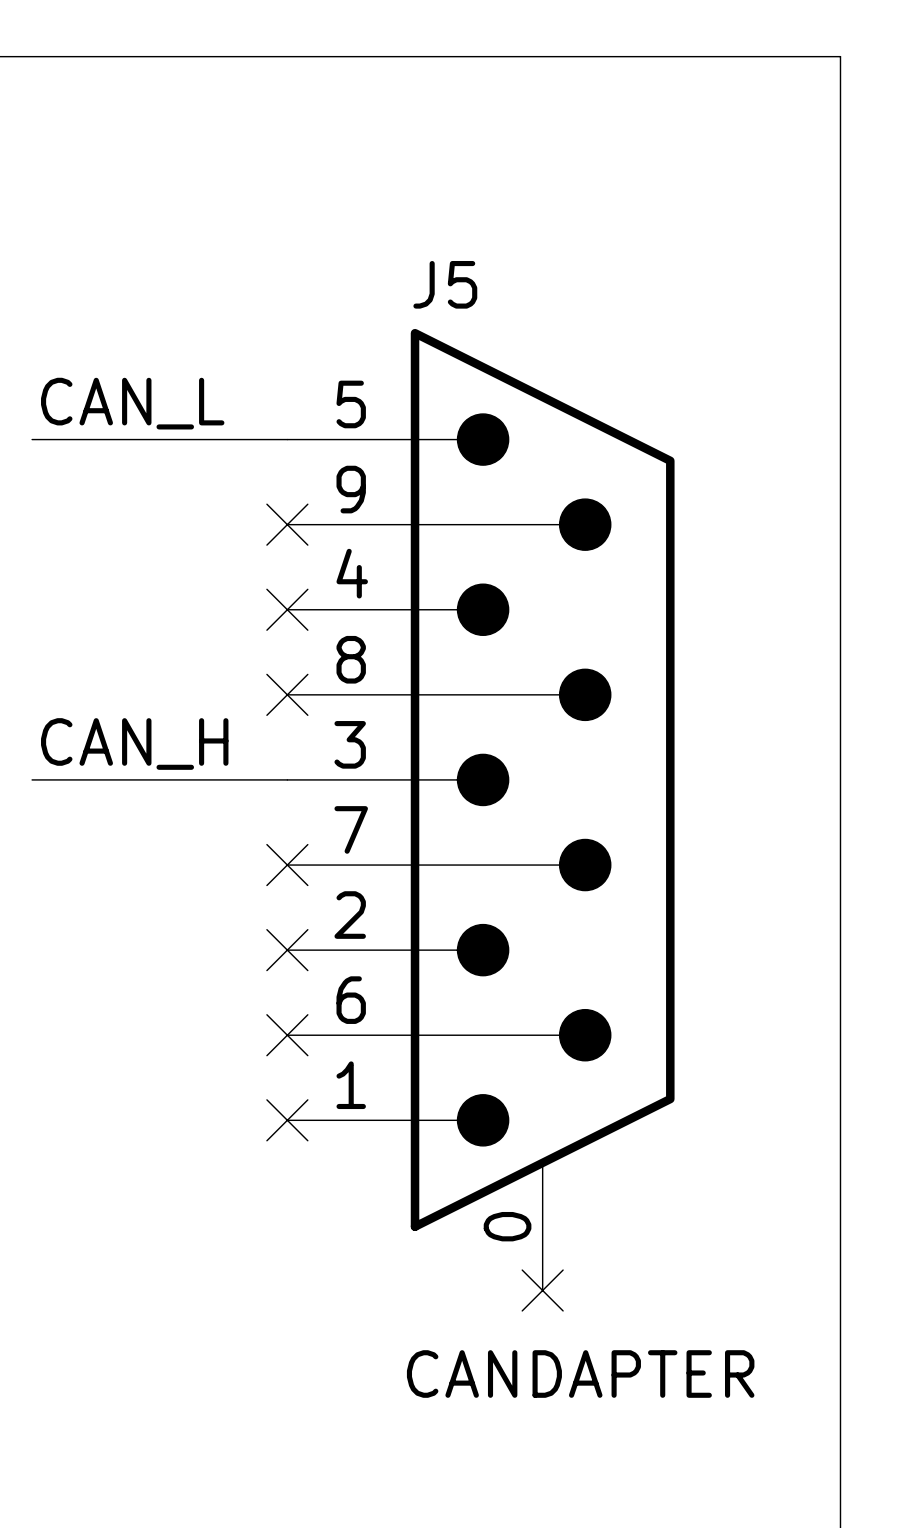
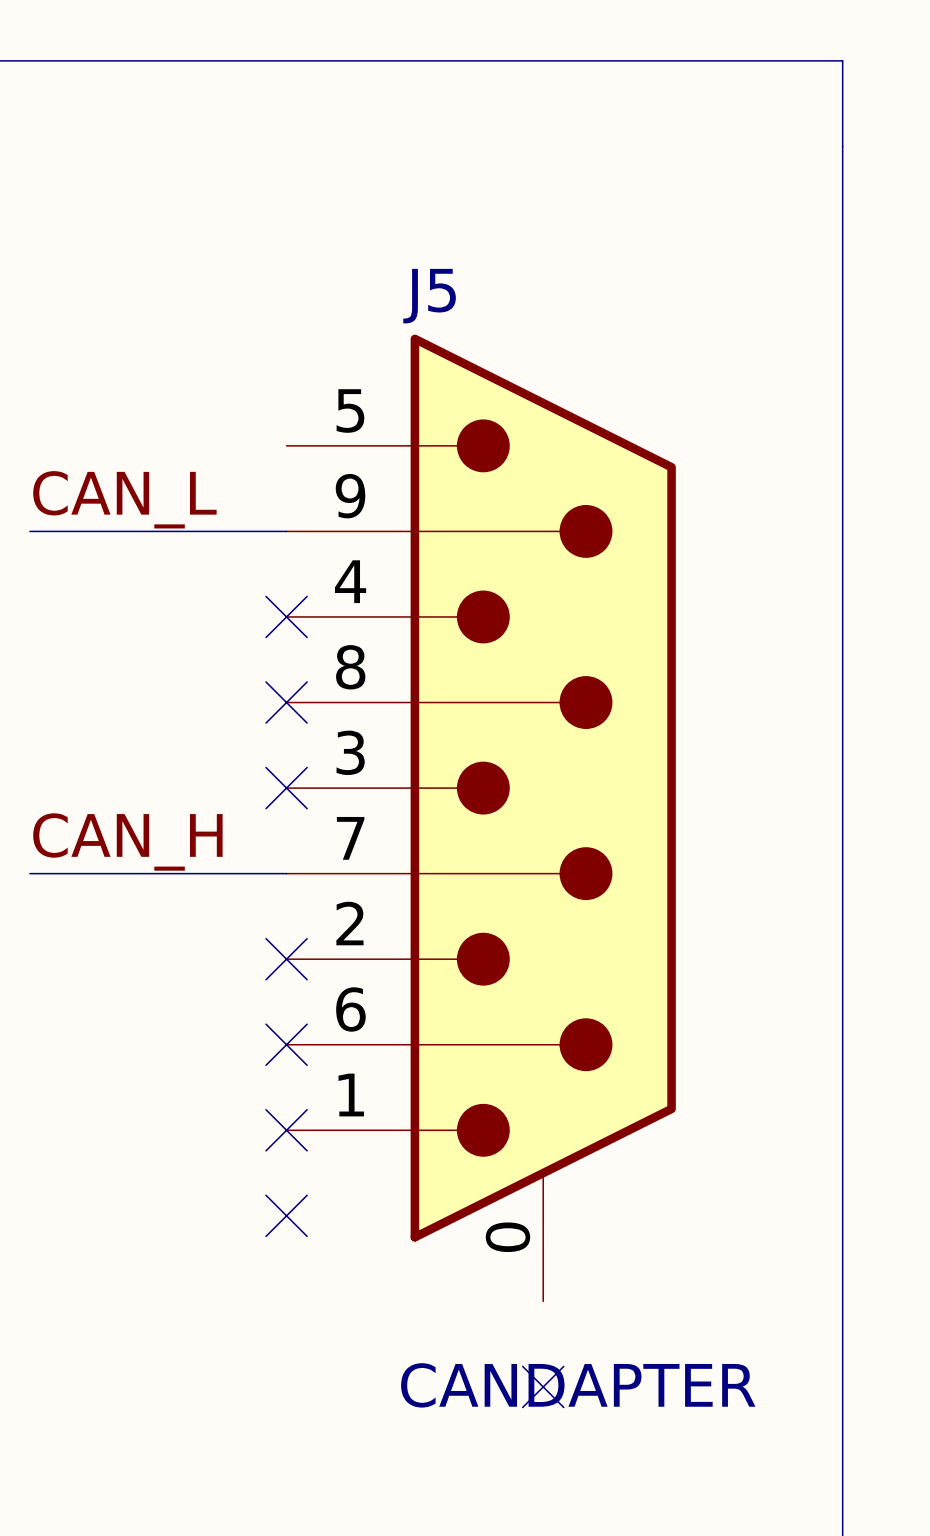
label position: CAN_L (132, 403) -> CAN_L (124, 499)
wire: (32, 439) (287, 439) -> (29, 531) (286, 531)
no-connect mark: (287, 524) -> none
label position: CAN_H (134, 744) -> CAN_H (127, 841)
wire: (32, 779) (287, 779) -> (29, 873) (286, 873)
no-connect mark position: (287, 865) -> (286, 788)
no-connect mark: none -> (286, 1215)
no-connect mark position: (542, 1290) -> (543, 1386)

